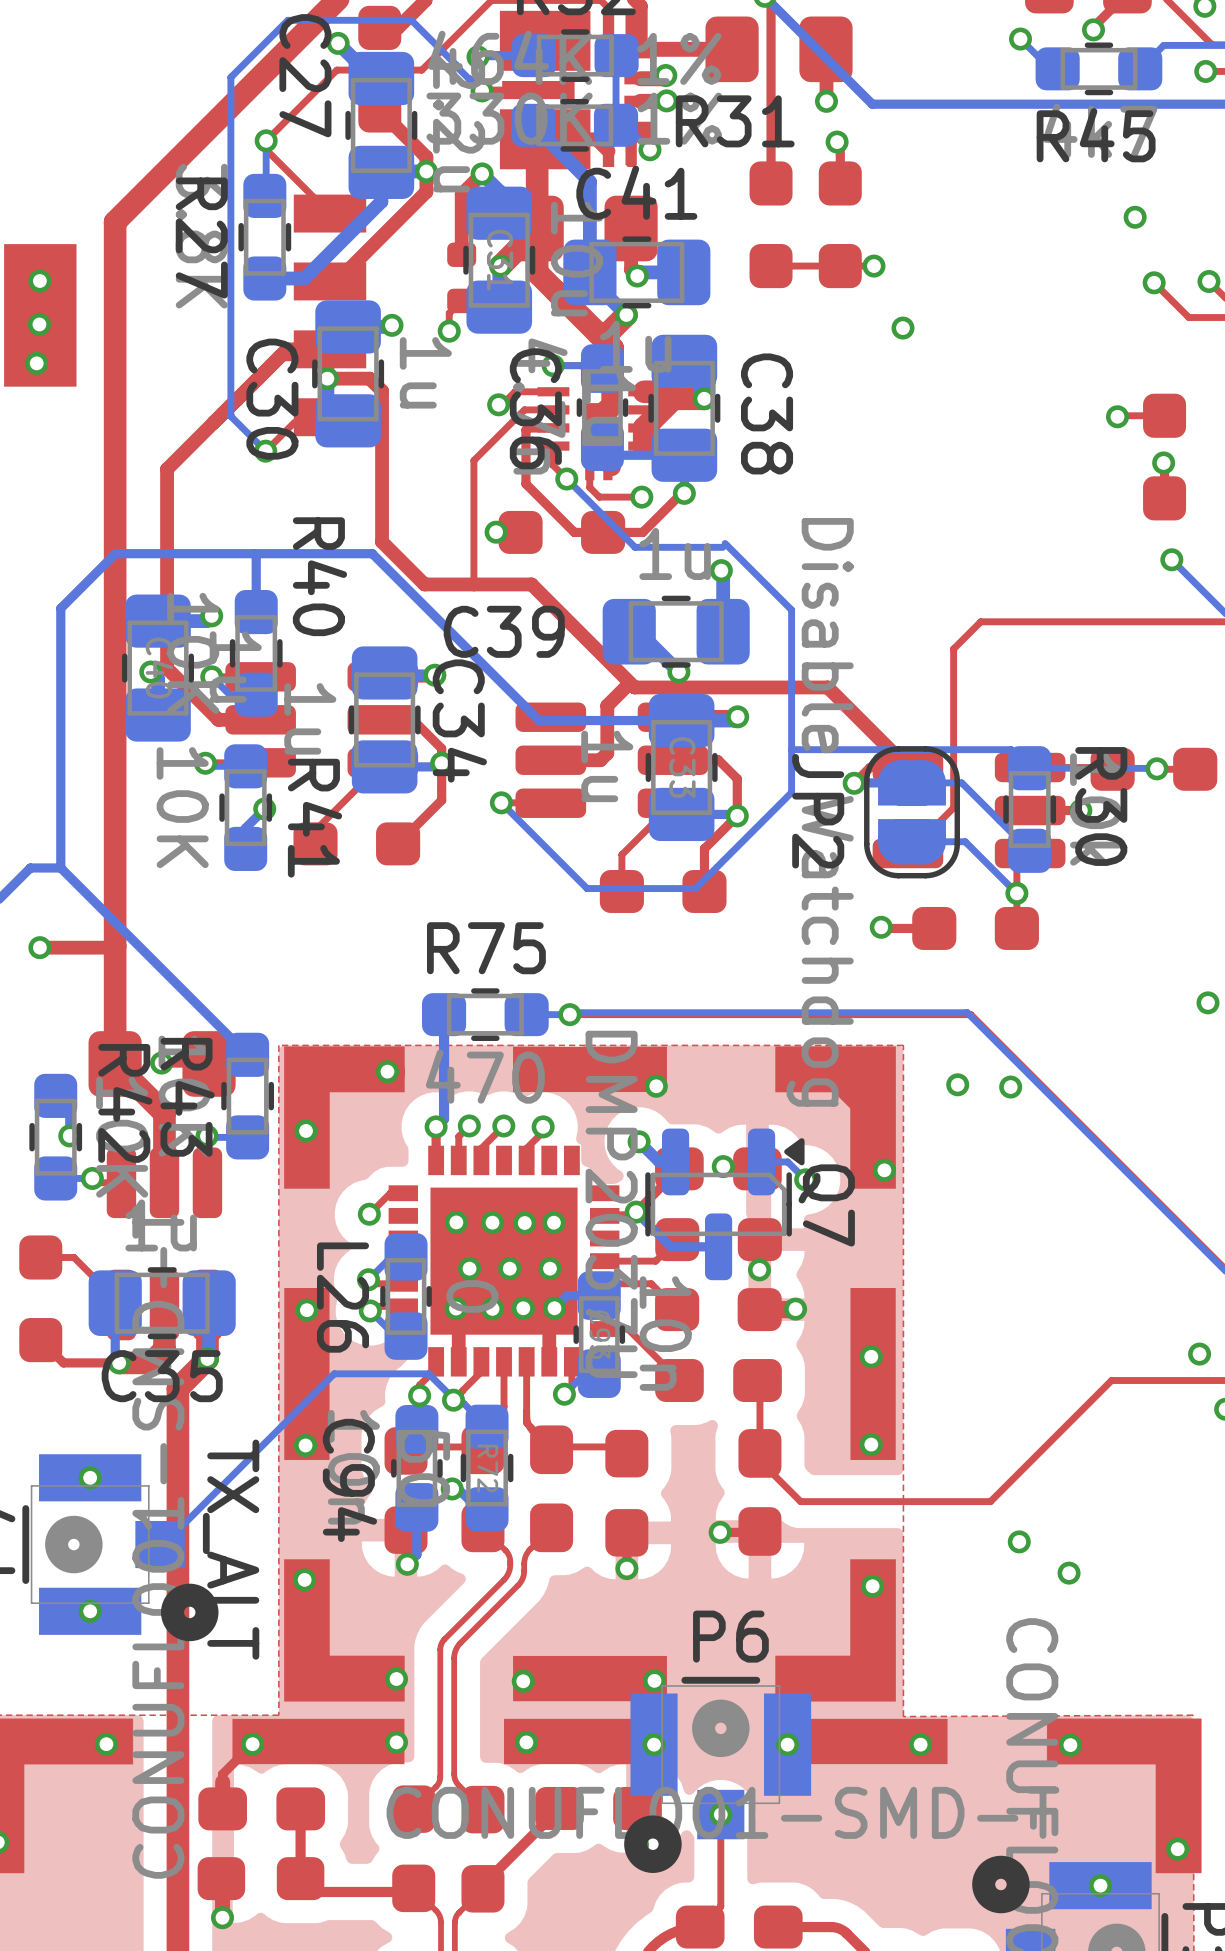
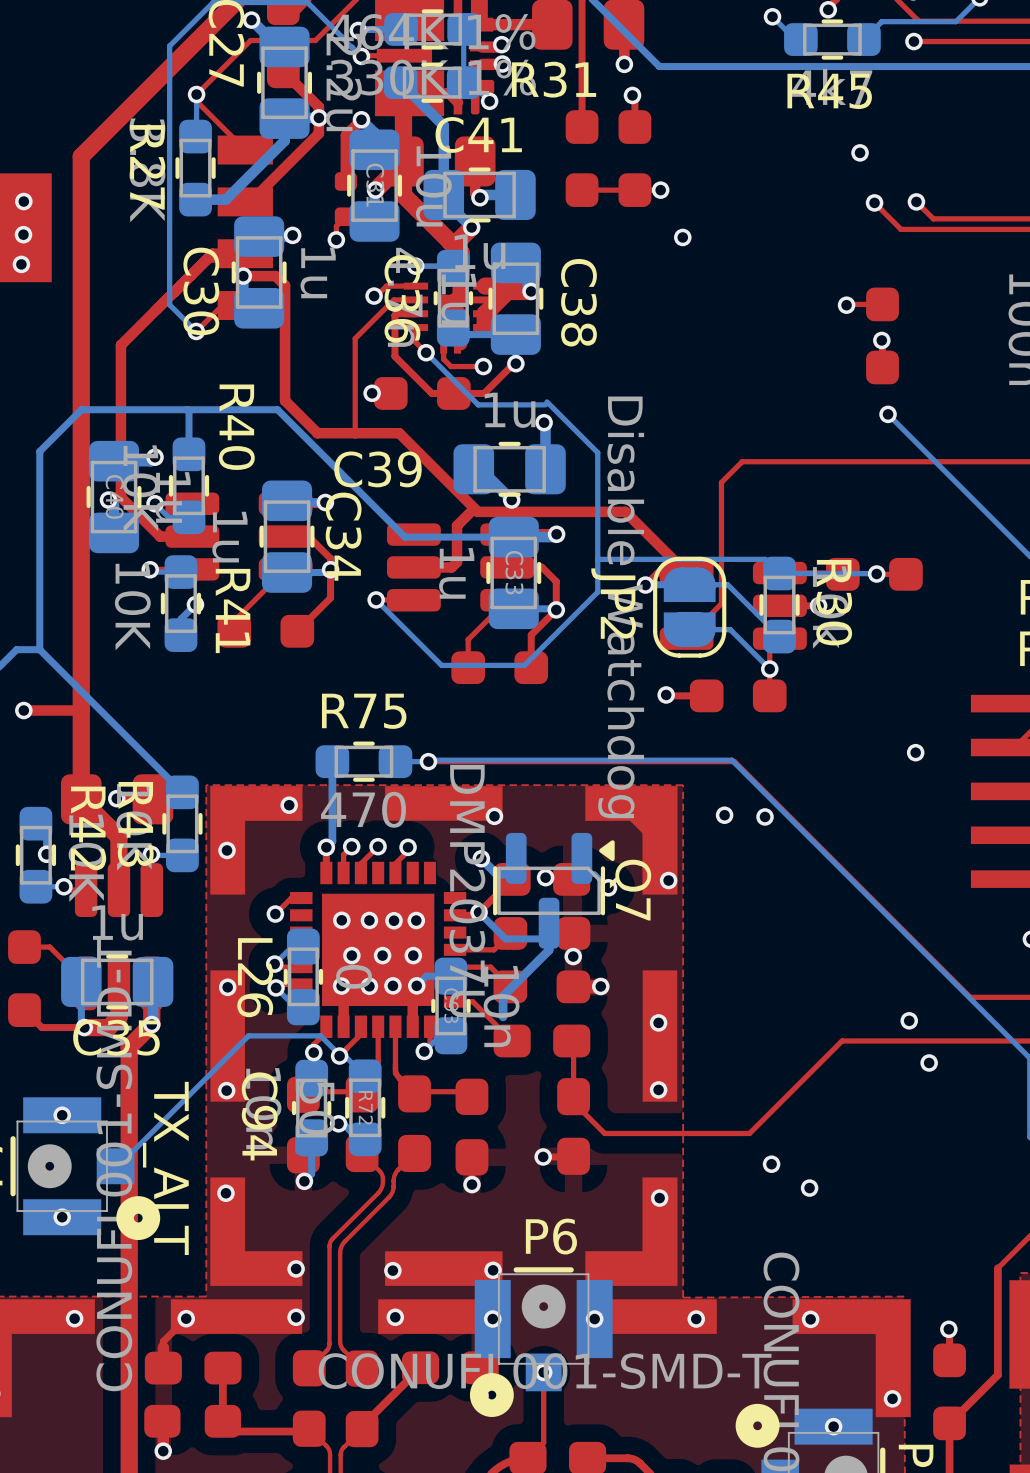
Q7 position: (724, 1204) -> (553, 890)
bottom track: none -> (549, 923) (549, 950) (503, 996) (503, 1016)

